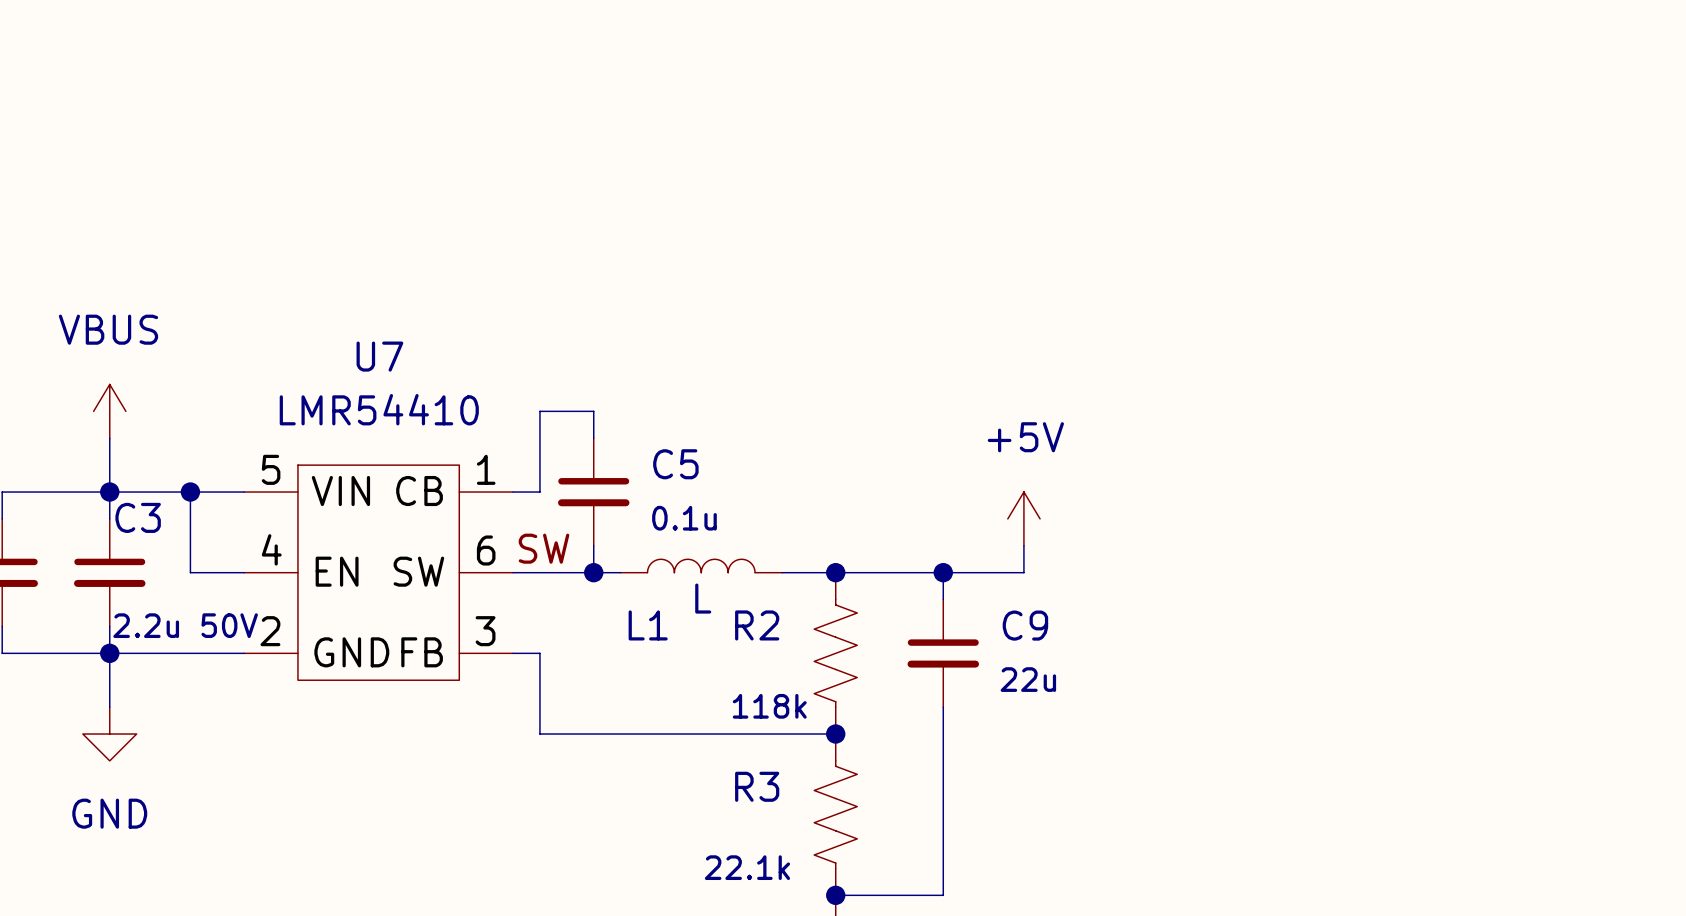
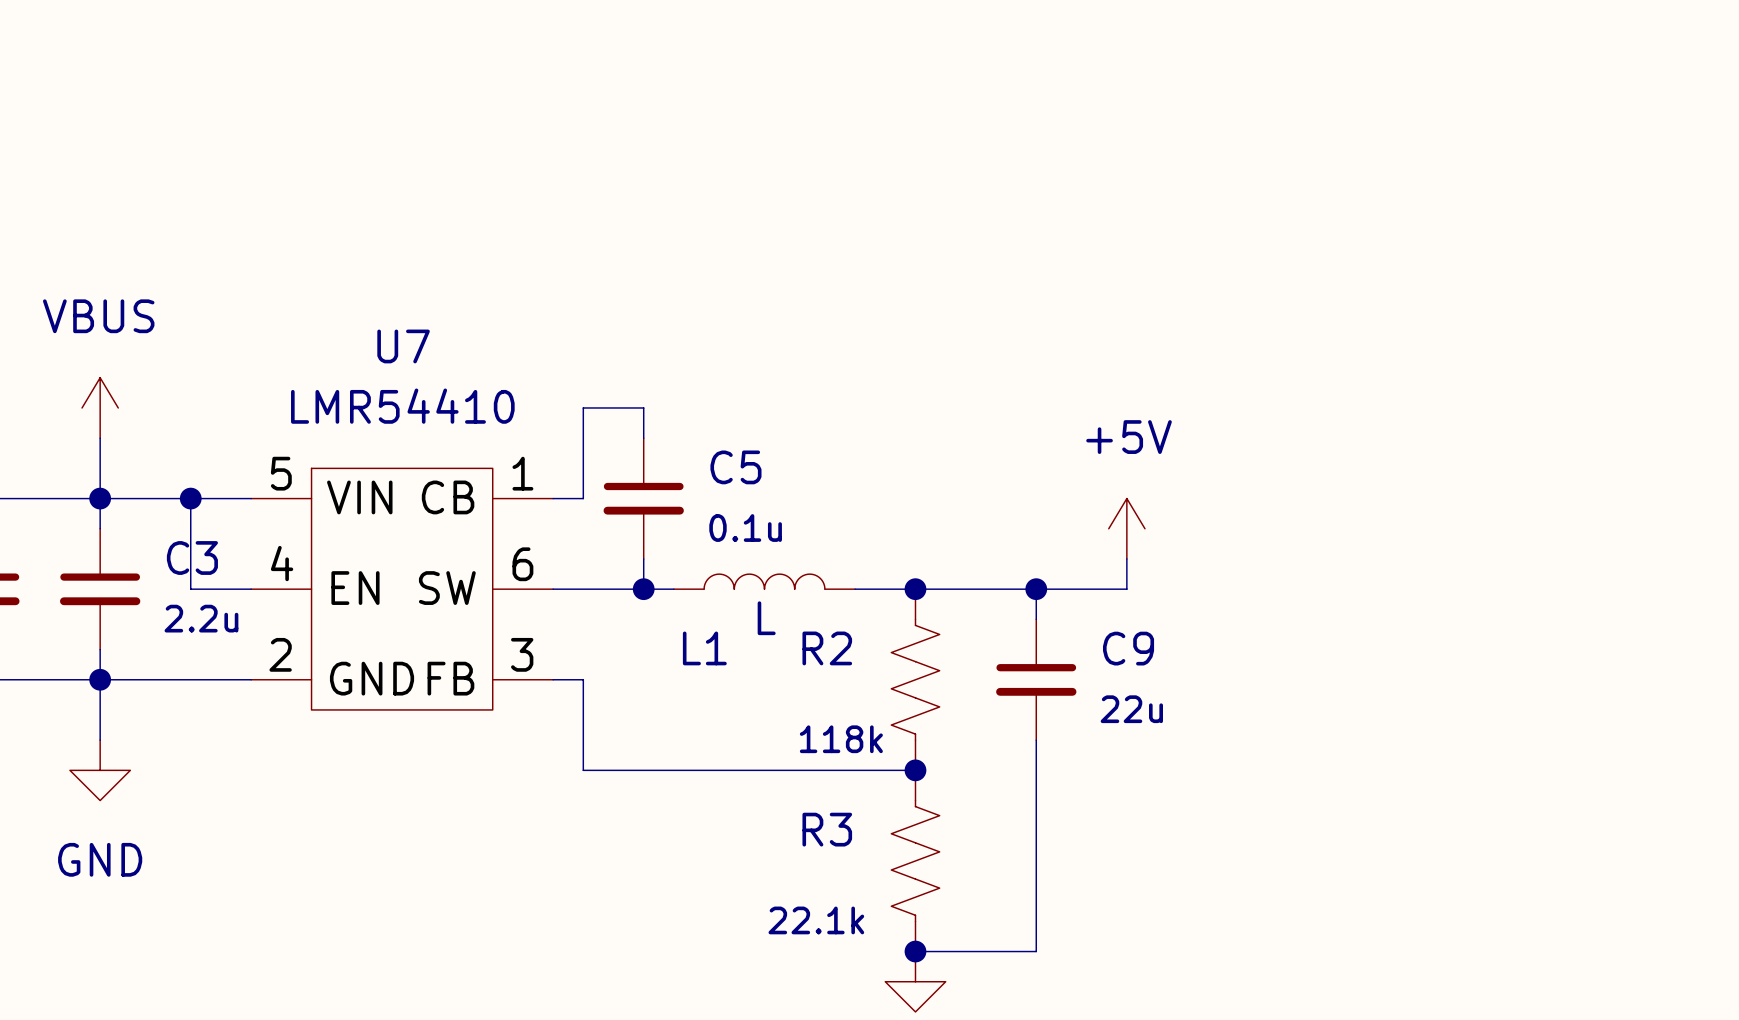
C3 name position: C3 (138, 517) -> C3 (192, 557)
label: SW (544, 548) -> none
C3 value: 2.2u 50V (185, 625) -> 2.2u (201, 618)

